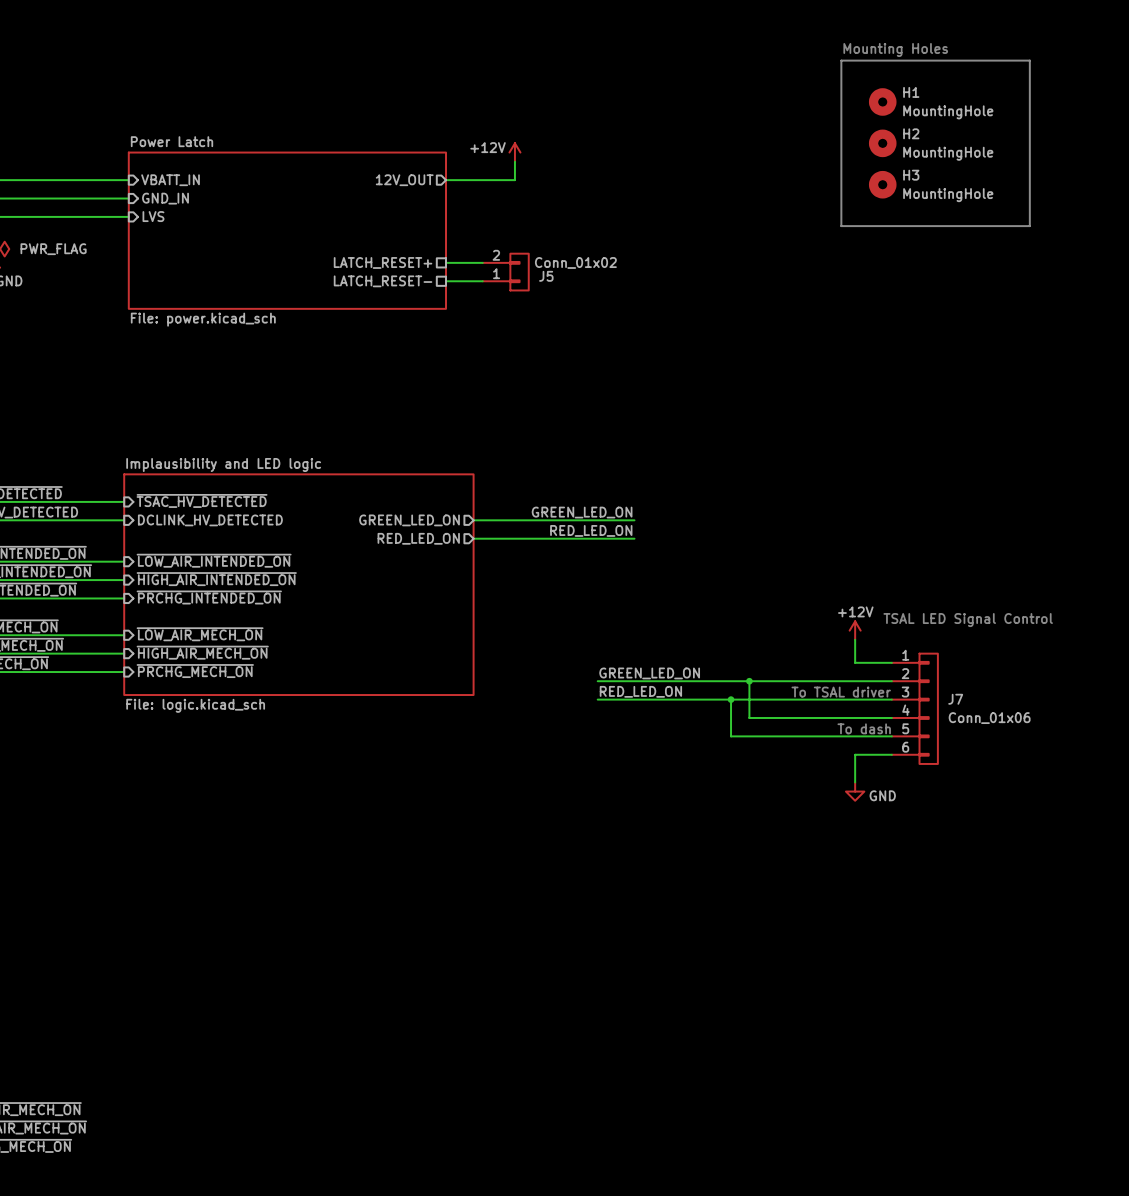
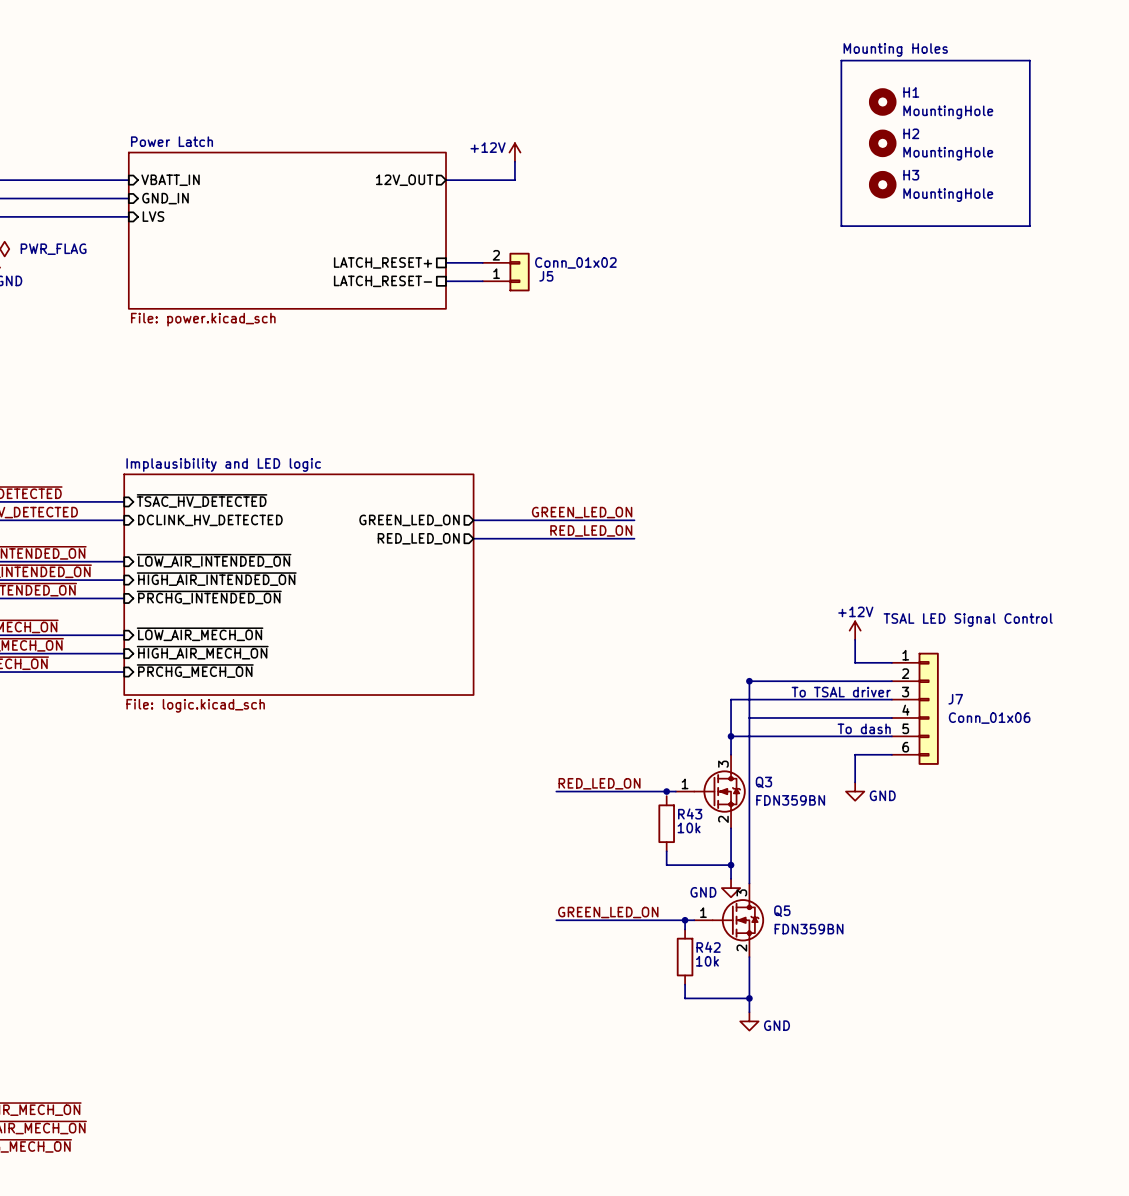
label: GREEN_LED_ON (649, 673) -> none
wire: (597, 681) (749, 681) -> none
label position: RED_LED_ON (640, 691) -> RED_LED_ON (599, 783)
wire: (597, 699) (731, 699) -> none
junction position: (731, 699) -> (731, 736)
wire: none -> (749, 717) (749, 883)
wire: none -> (731, 736) (731, 754)
wire: none -> (556, 791) (675, 791)
junction: none -> (666, 791)
Q3: none -> FDN359BN (710, 791)
R43: none -> 10k (666, 823)
wire: none -> (731, 828) (731, 878)
wire: none -> (666, 851) (666, 865) (731, 865)
junction: none -> (731, 865)
power symbol: none -> GND (731, 888)
label: none -> GREEN_LED_ON (608, 912)
wire: none -> (556, 920) (694, 920)
wire: none -> (685, 920) (685, 929)
junction: none -> (685, 920)
Q5: none -> FDN359BN (729, 920)
R42: none -> 10k (685, 957)
wire: none -> (749, 957) (749, 1012)
wire: none -> (685, 984) (685, 998) (749, 998)
junction: none -> (749, 998)
power symbol: none -> GND (749, 1021)

